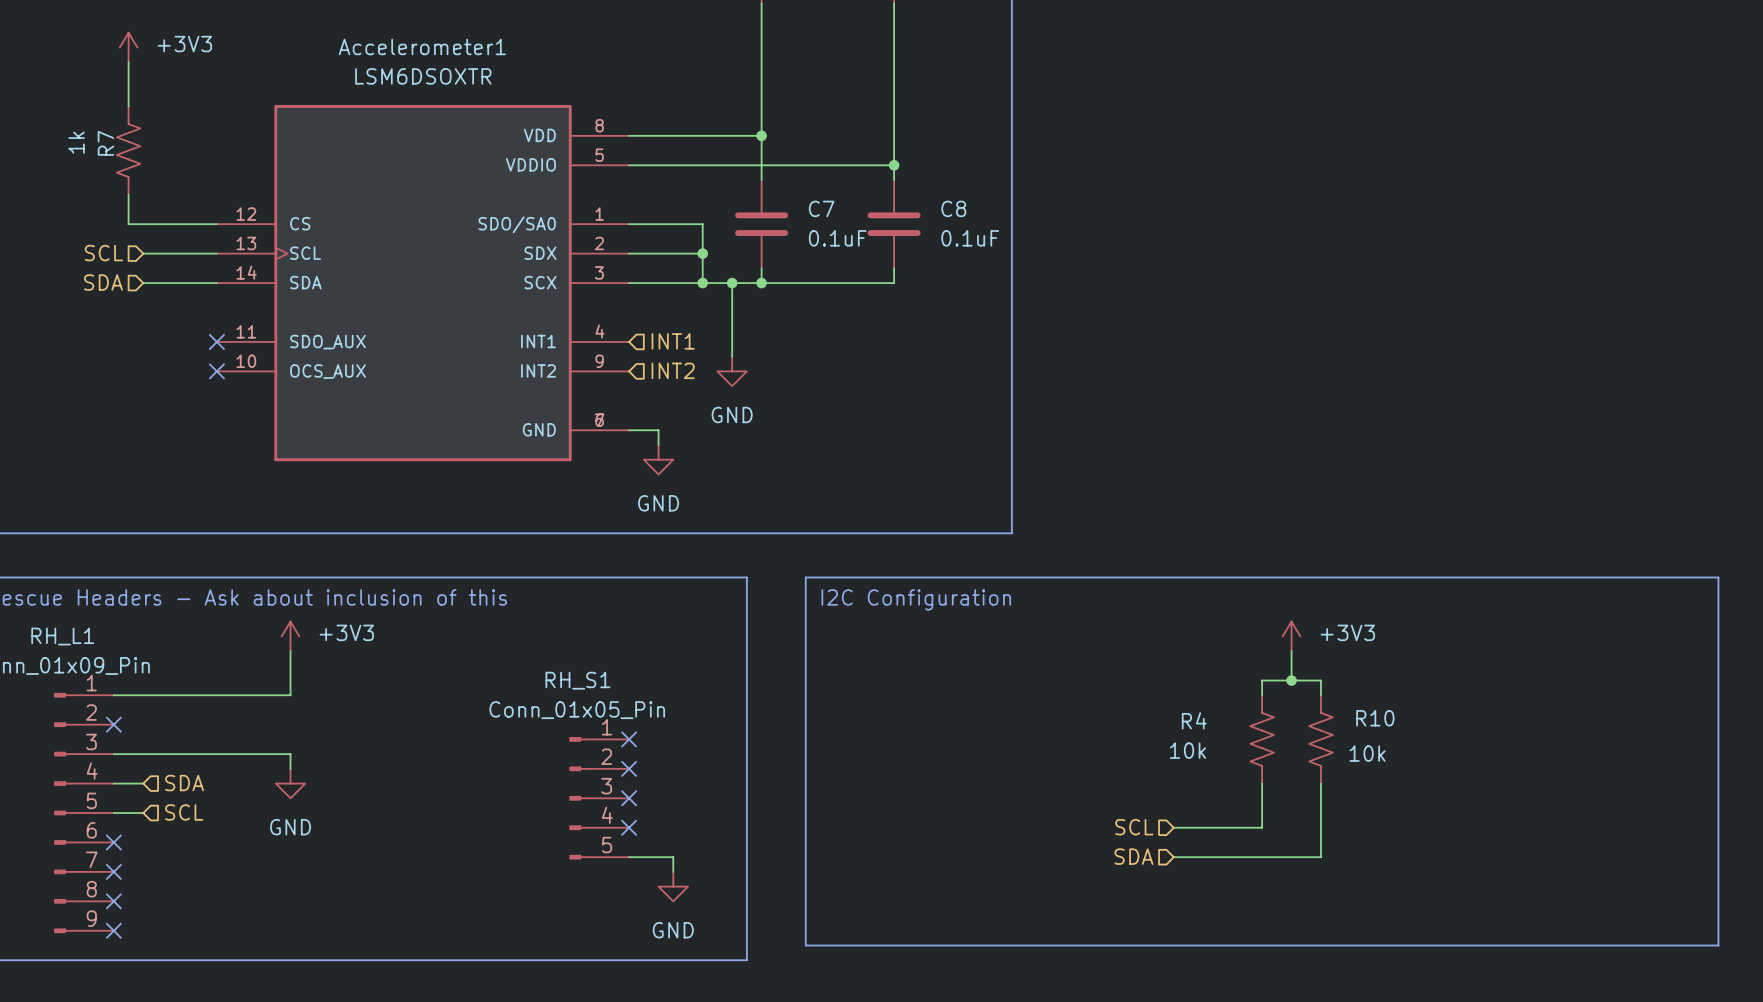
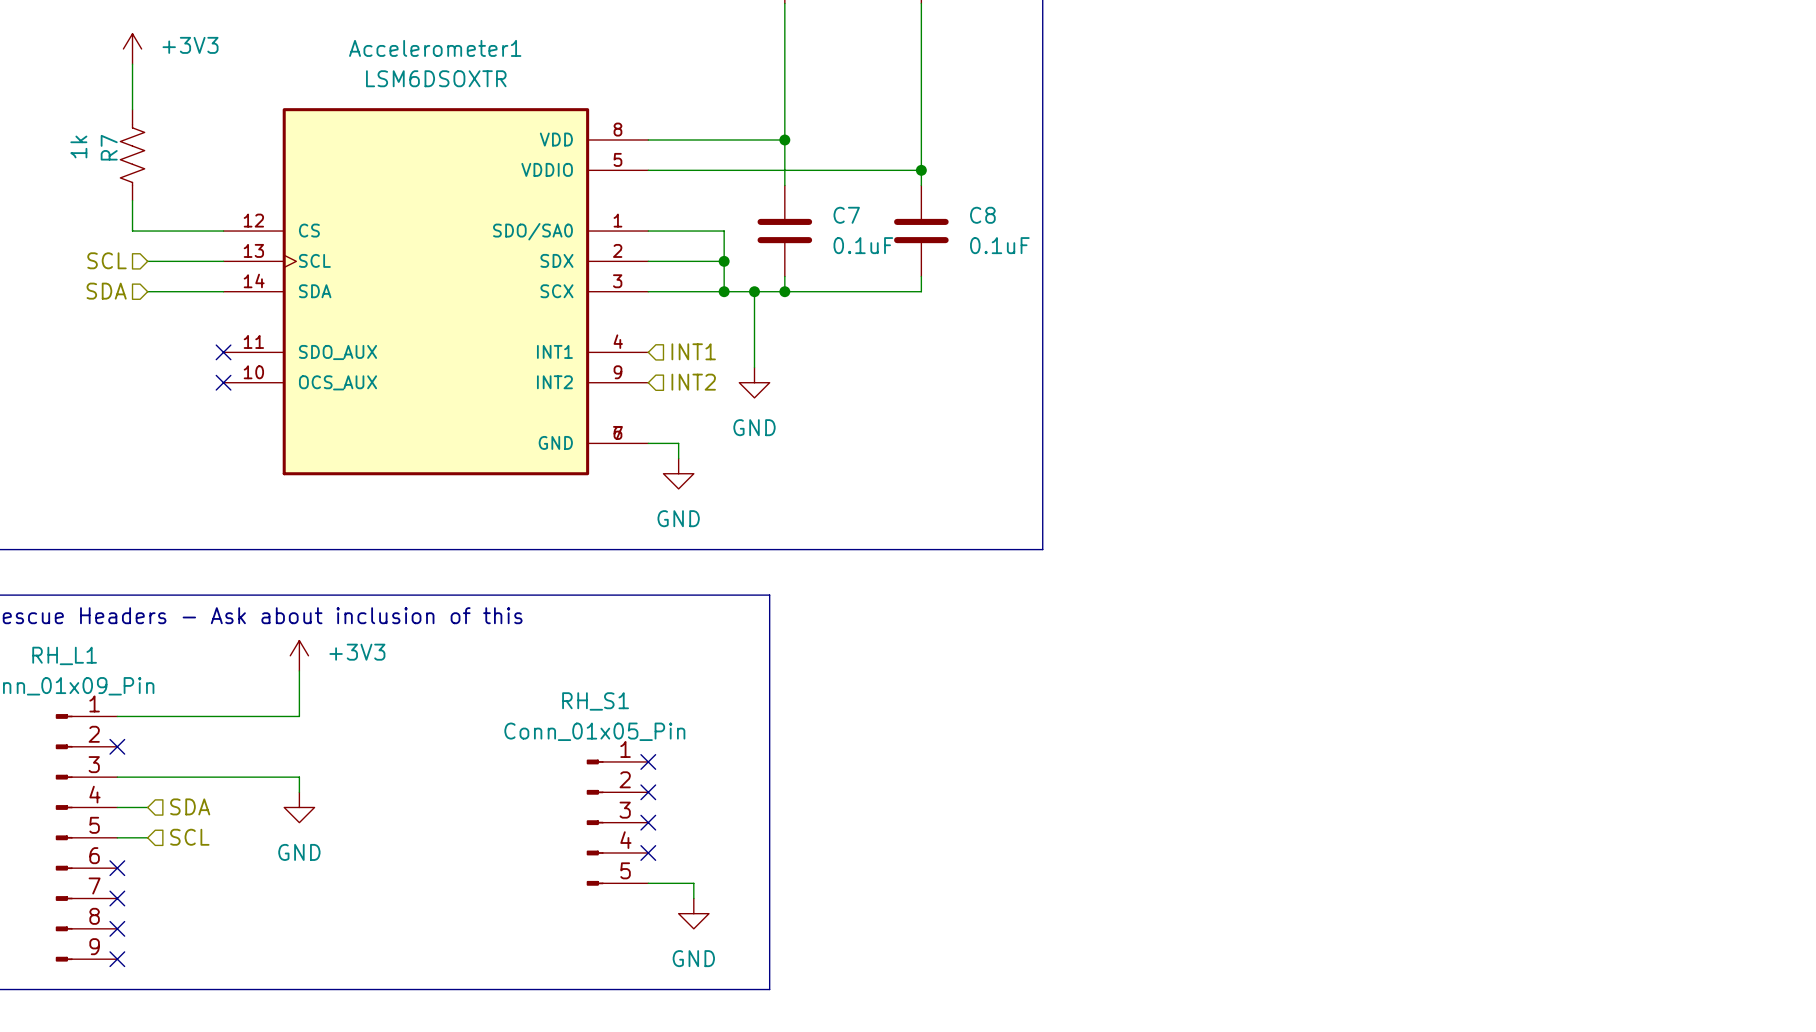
line: (805, 577) (1718, 577) (1718, 945) (805, 945) (805, 577) -> none
text: I2C Configuration (916, 599) -> none
power symbol: +3V3 (1291, 636) -> none
wire: (1291, 651) (1291, 680) -> none
junction: (1291, 680) -> none
wire: (1262, 695) (1262, 680) (1321, 680) (1321, 695) -> none
R4: 10k (1262, 739) -> none
R10: 10k (1321, 739) -> none
wire: (1262, 783) (1262, 827) (1173, 827) -> none
wire: (1321, 783) (1321, 857) (1173, 857) -> none
hierarchical label: SCL (1134, 827) -> none
hierarchical label: SDA (1133, 856) -> none

